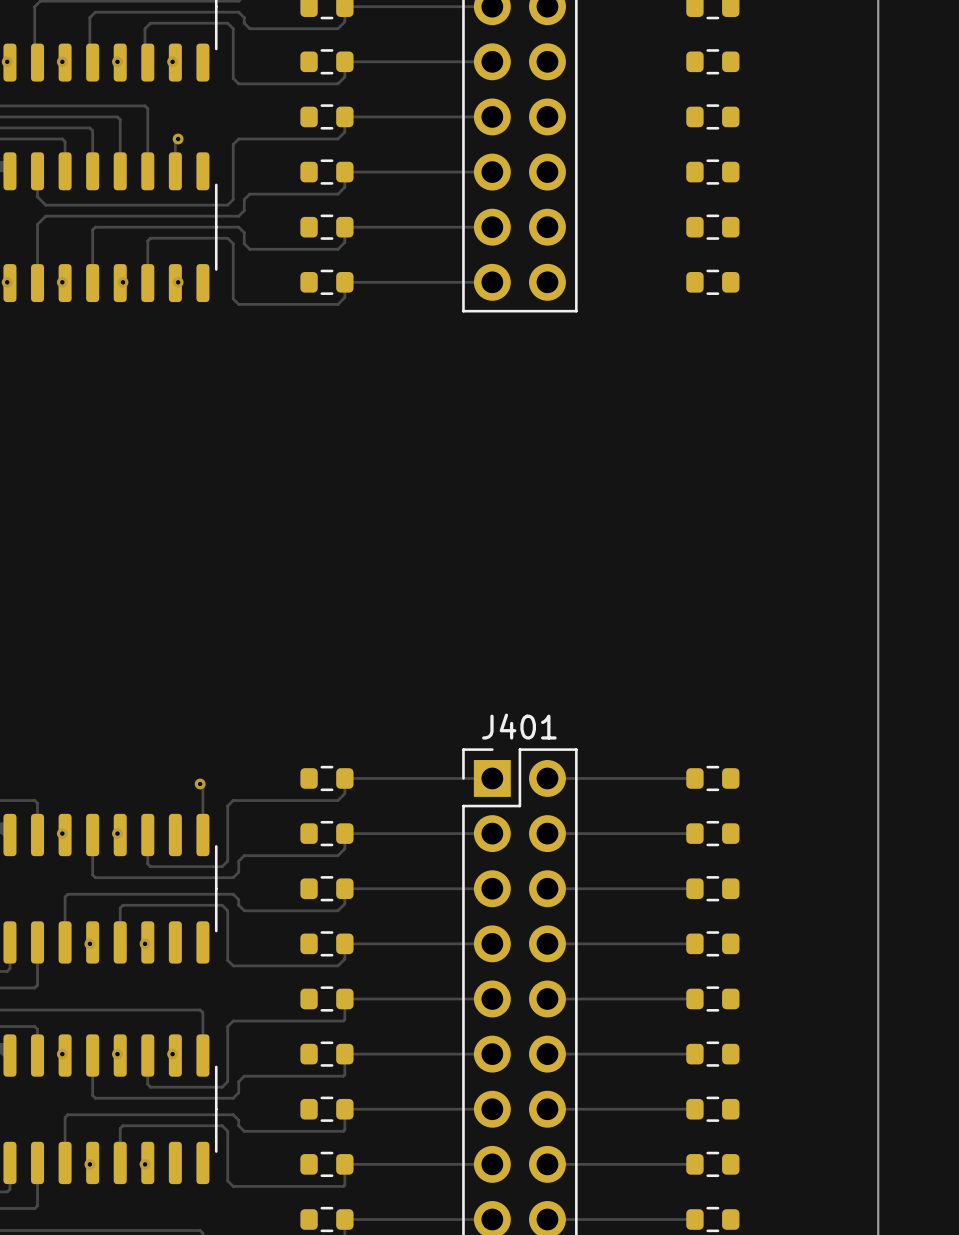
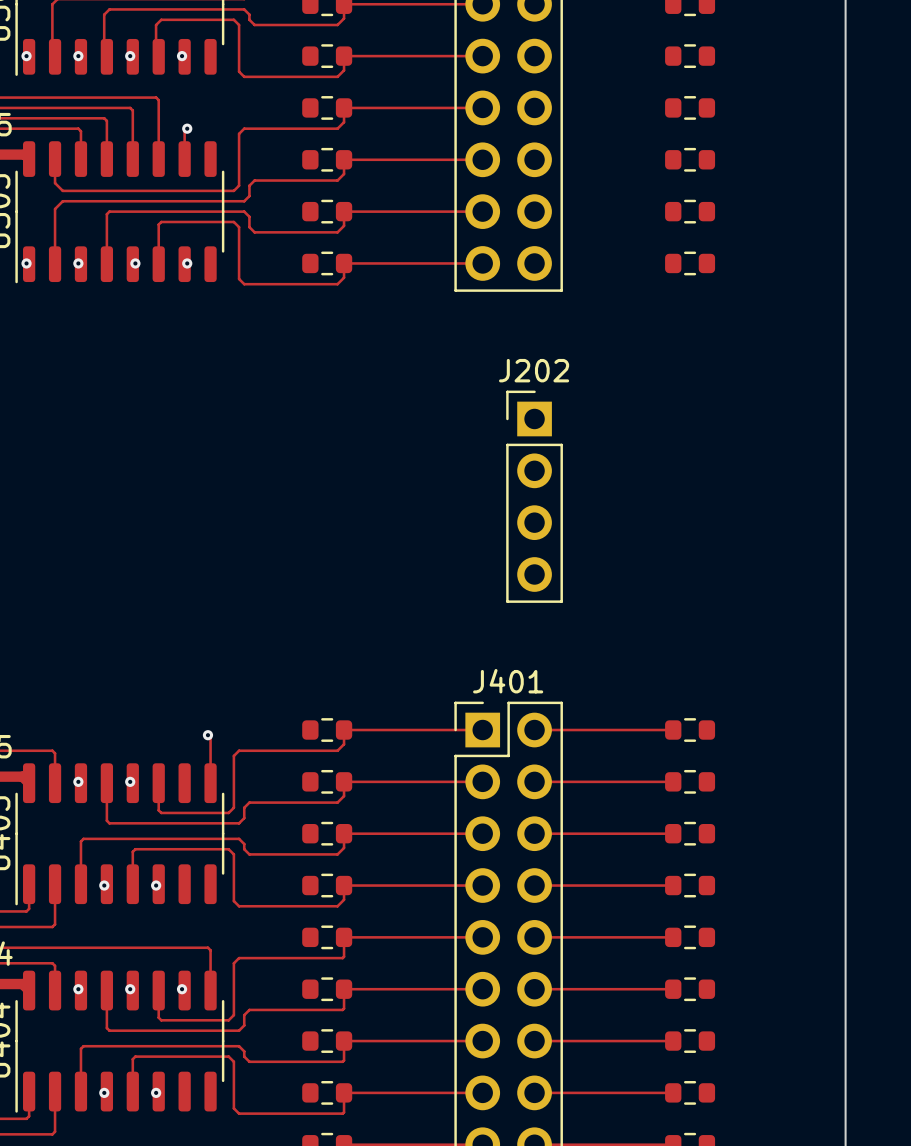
J202: none -> (534, 496)

